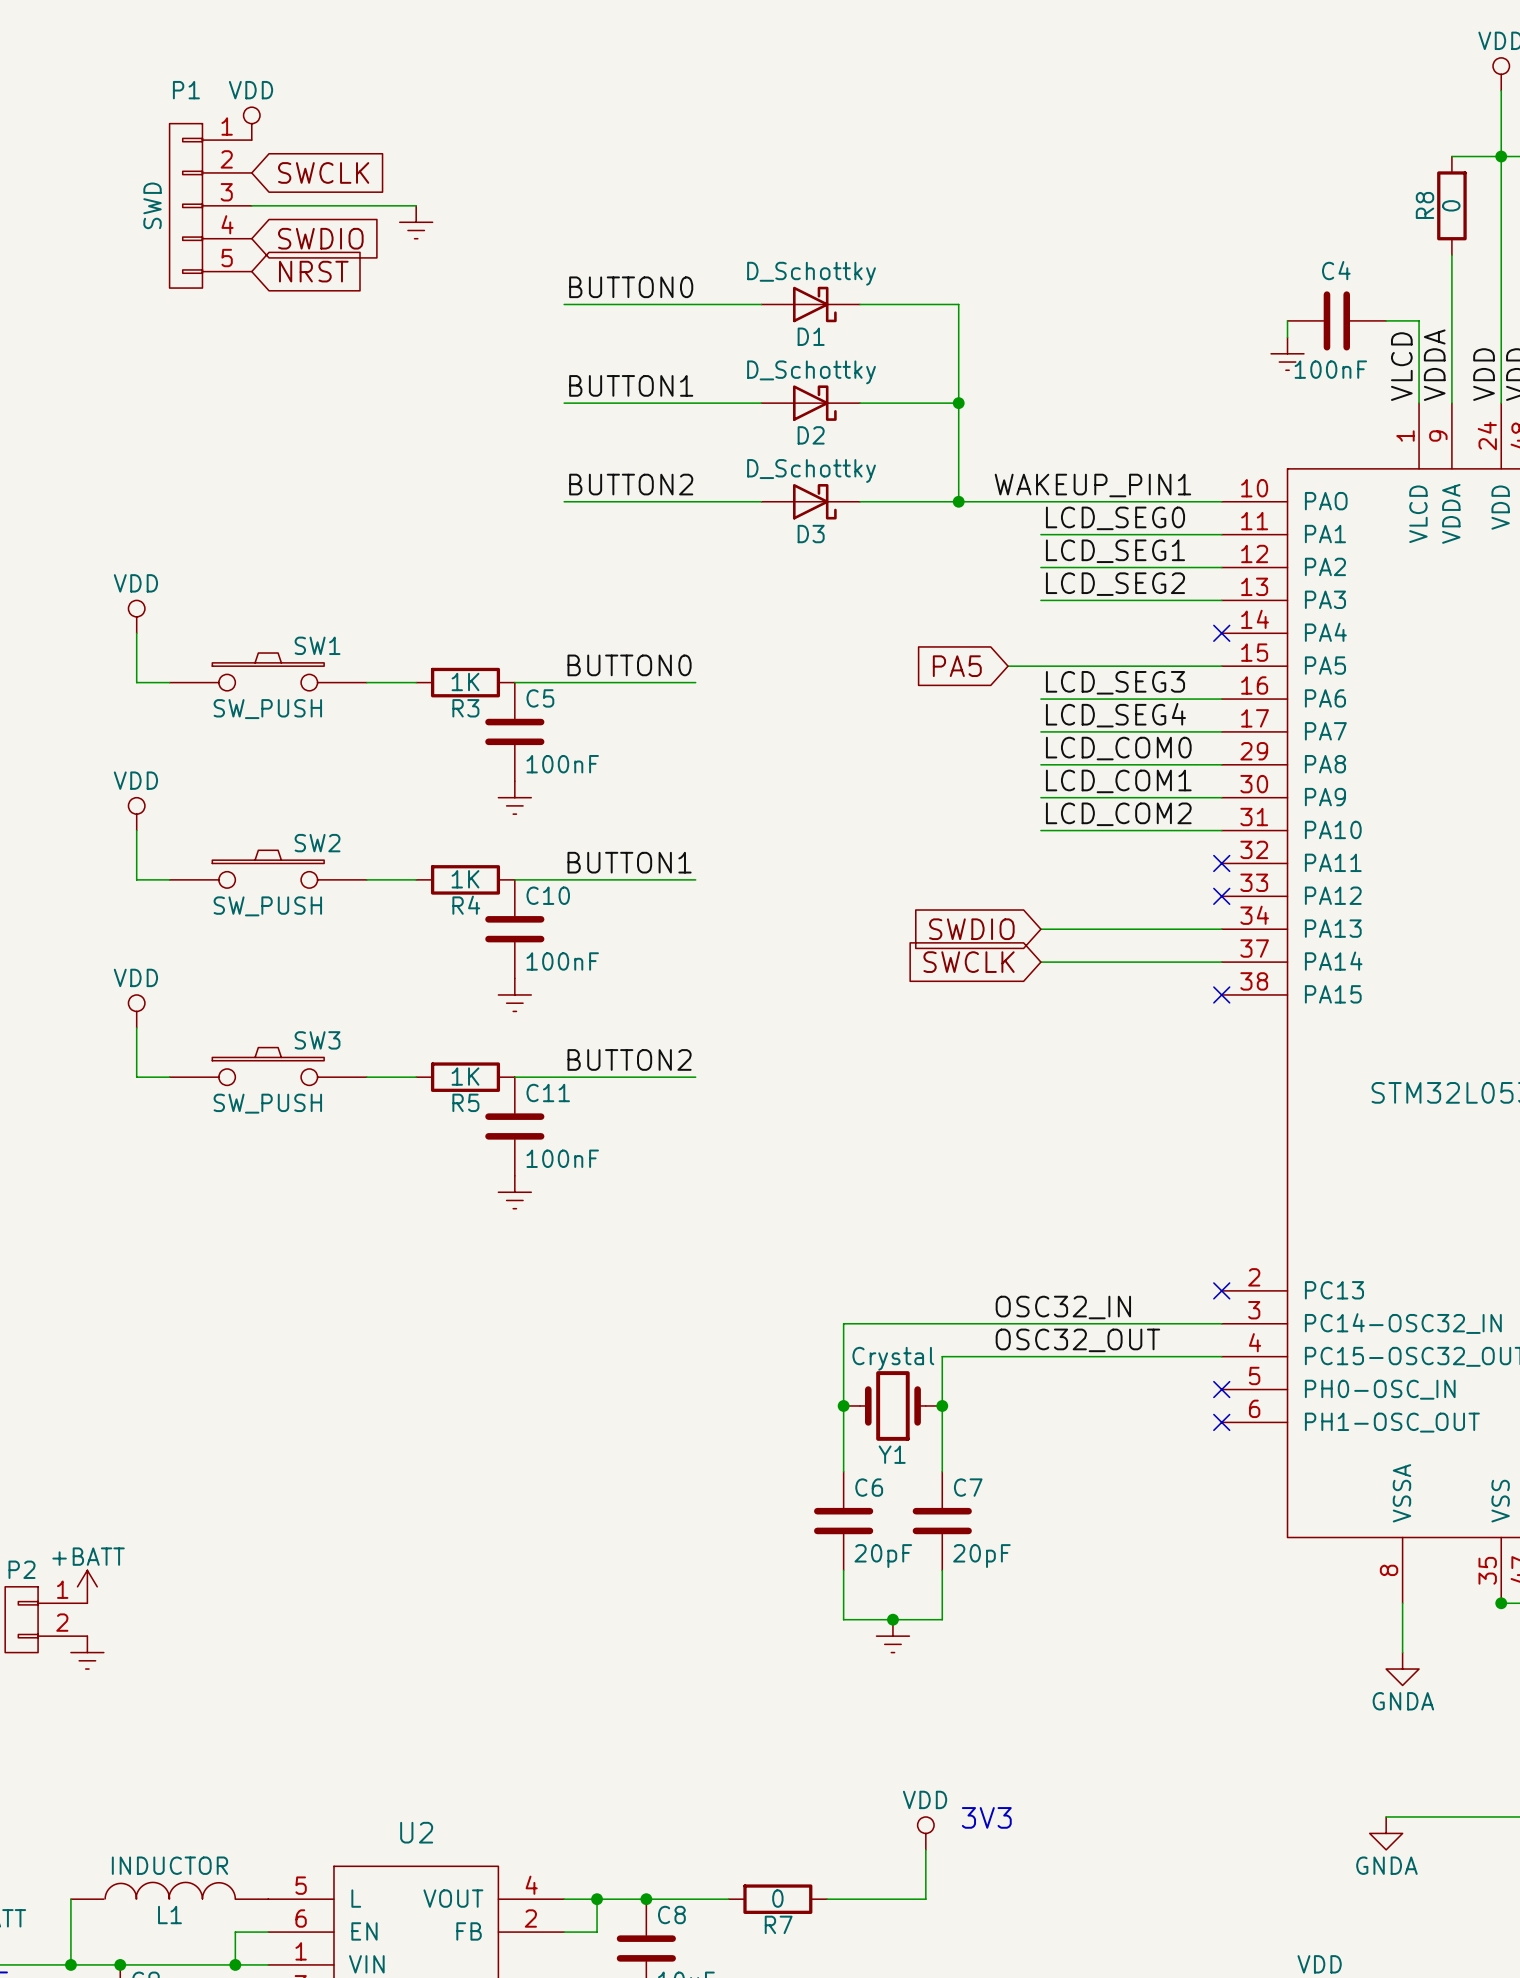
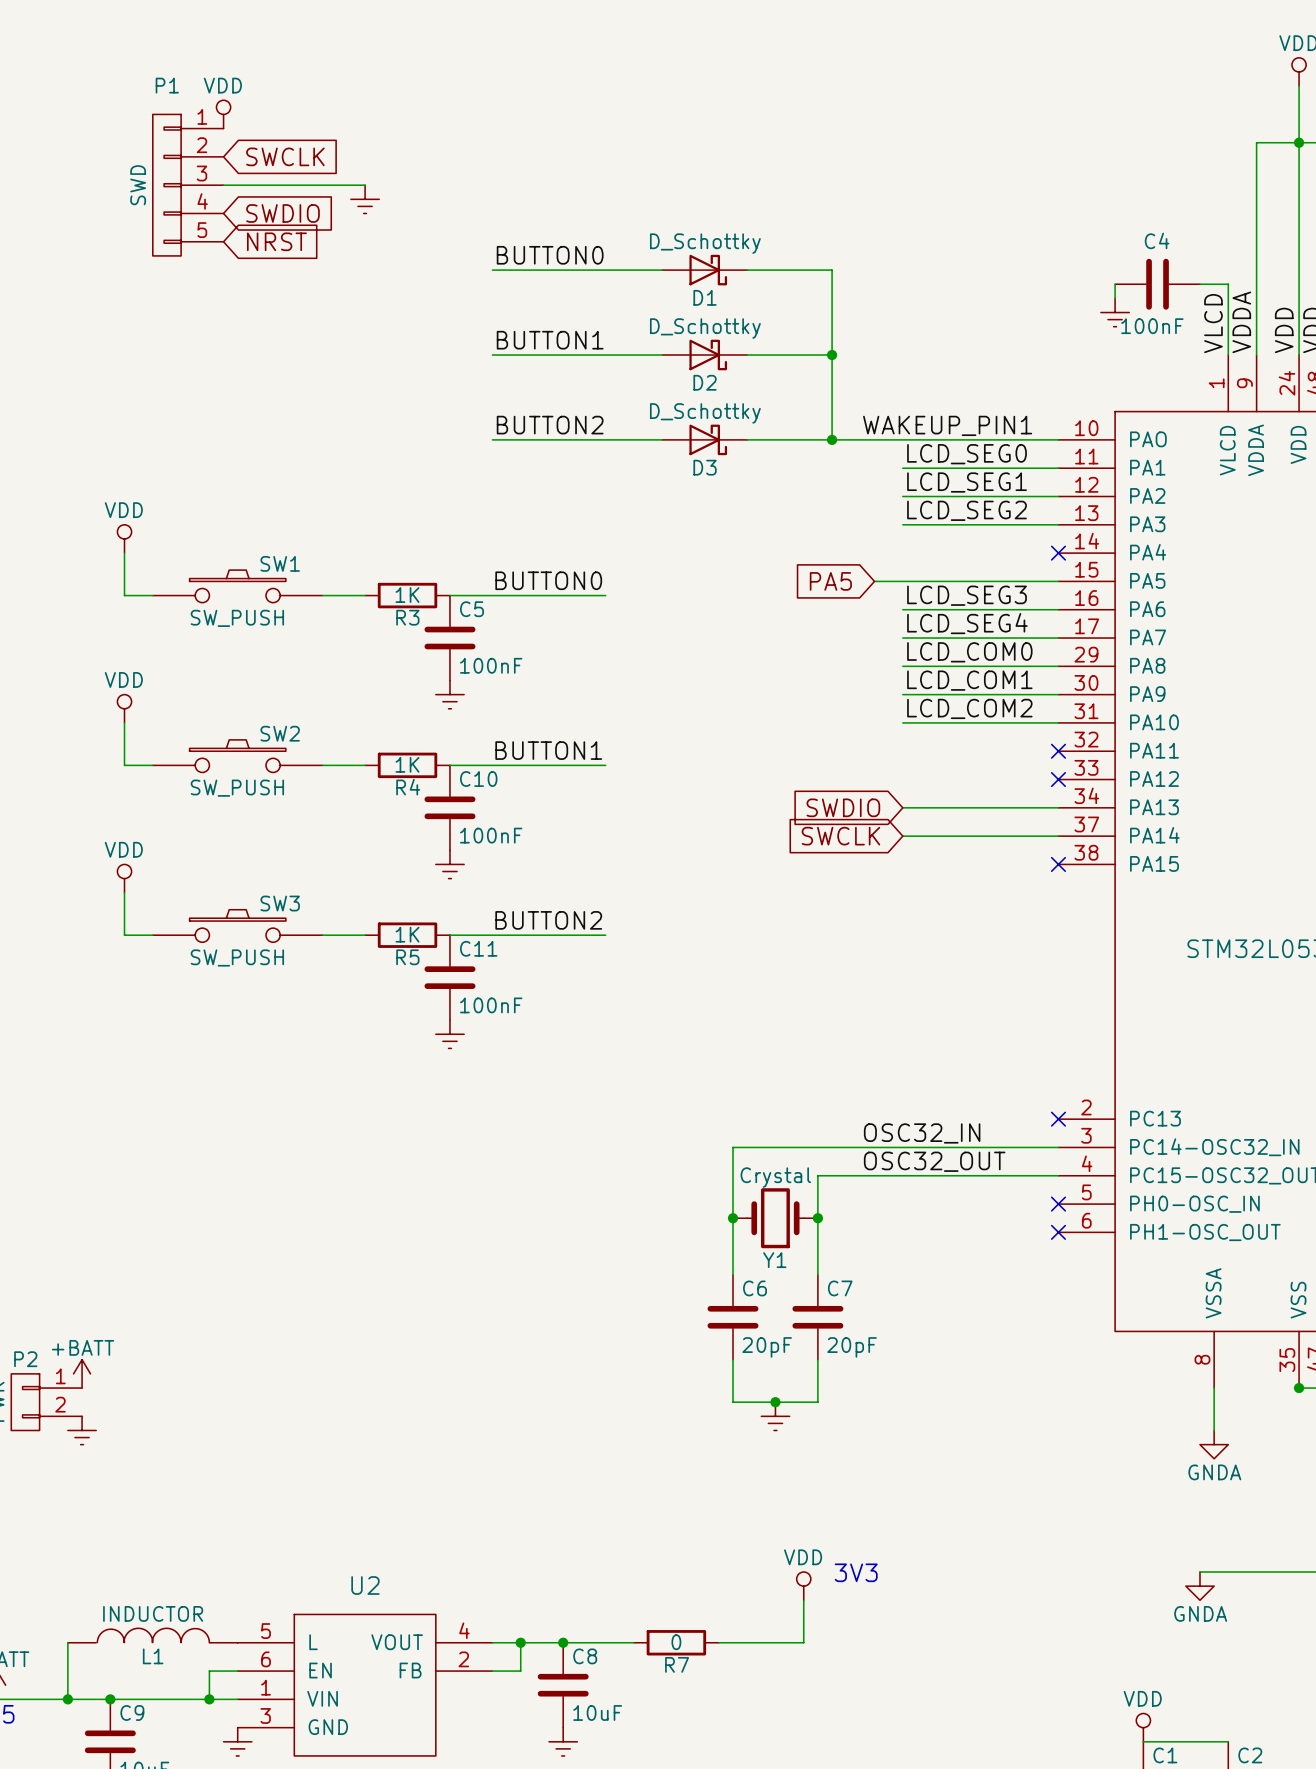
wire: none -> (1256, 142) (1256, 227)
R8: 0 (1451, 205) -> none

